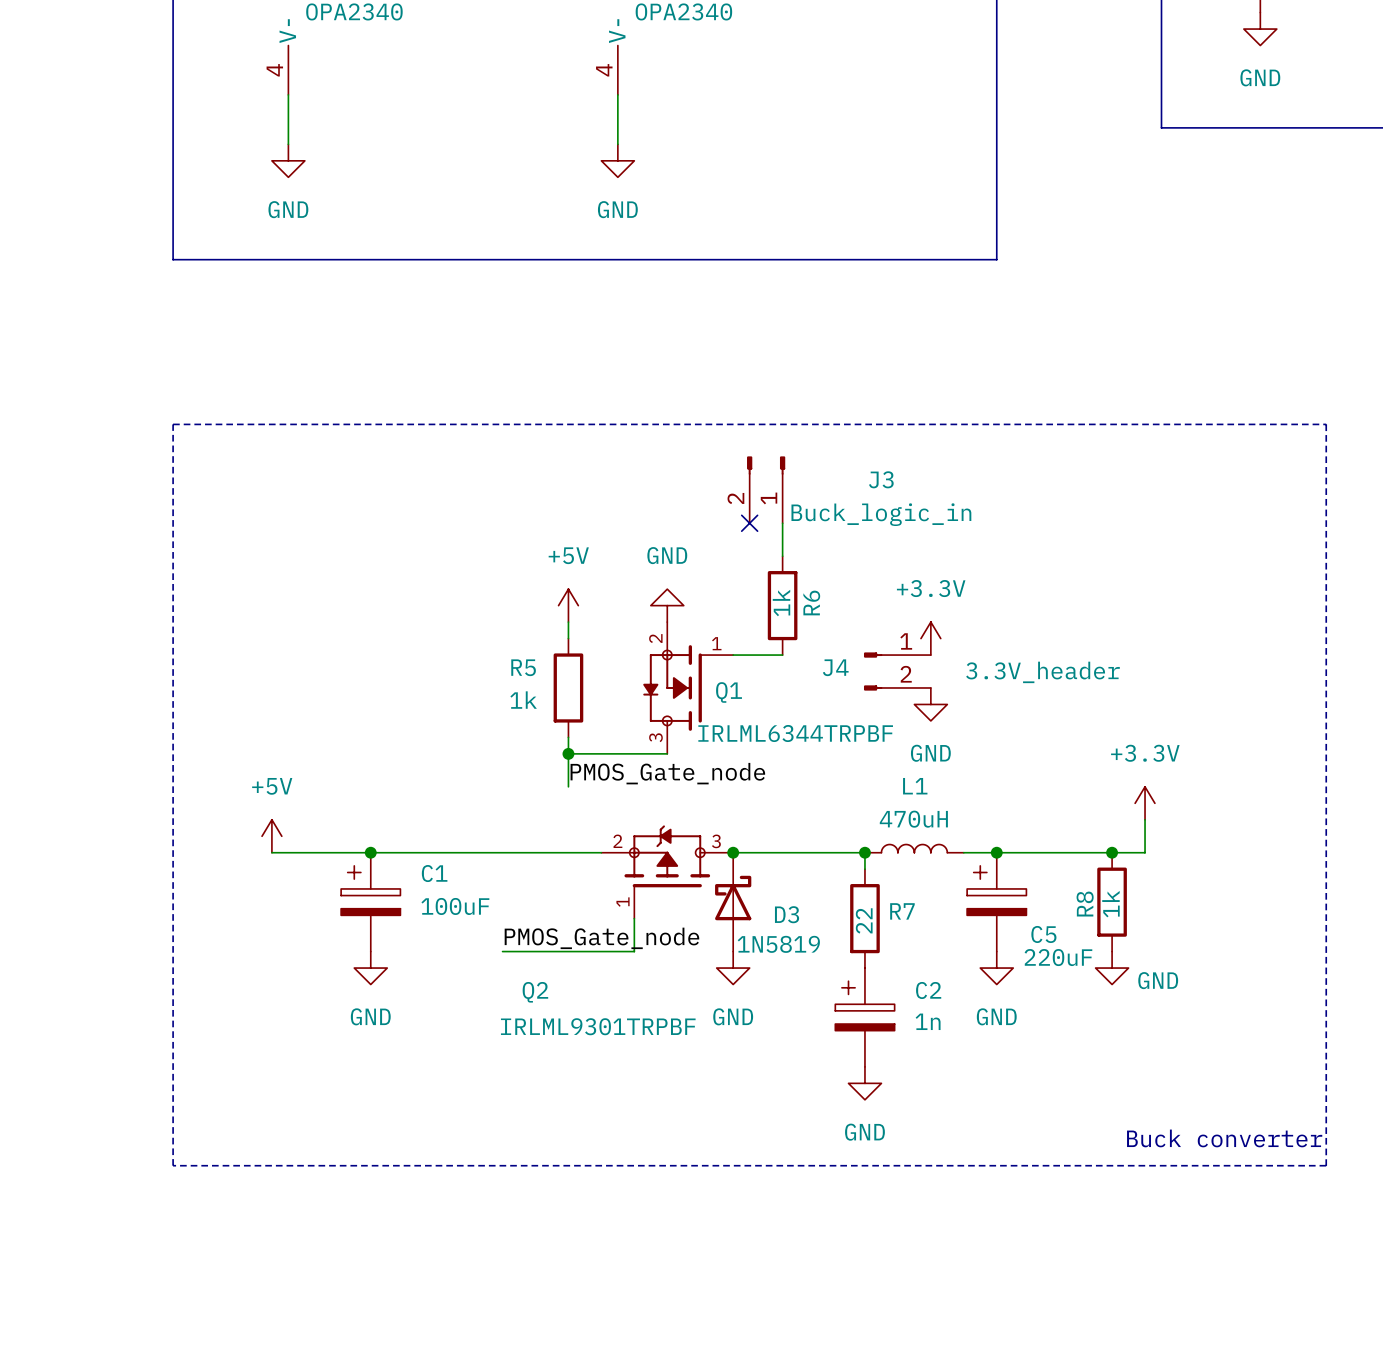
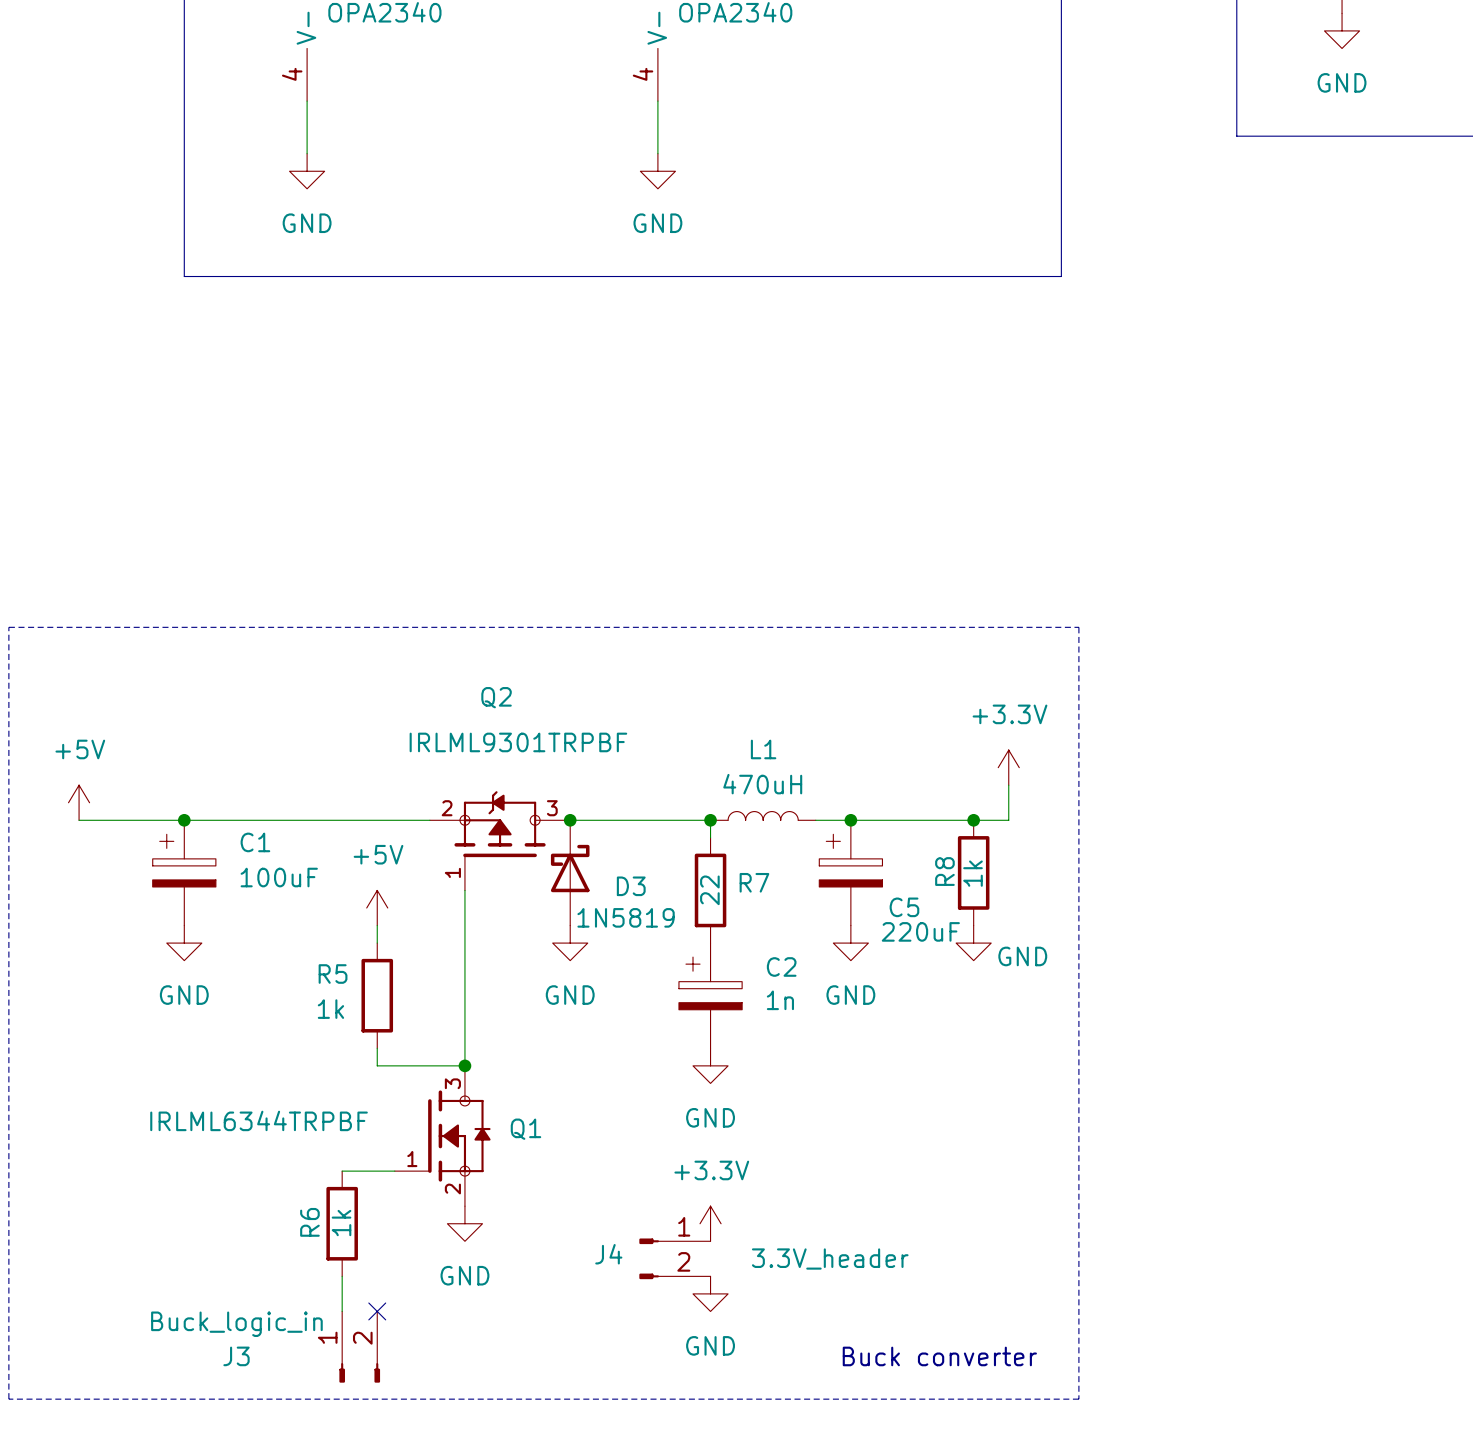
line: (173, 424) (1326, 424) (1326, 1165) (173, 1165) (173, 424) -> none
J3 rotation: 0° (766, 465) -> 180° (359, 1372)
J3 position: (766, 489) -> (359, 1347)
no-connect mark: (749, 523) -> none
wire: (782, 523) (782, 556) -> none
line: none -> (8, 627) (1078, 627) (1078, 1399) (8, 1399) (8, 627)
R6 name position: R6 (811, 603) -> R6 (309, 1222)
power symbol: +5V (568, 605) -> none
power symbol: GND (667, 605) -> none
R6 position: (782, 605) -> (342, 1223)
wire: (568, 622) (568, 638) -> none
power symbol position: +3.3V (930, 638) -> +3.3V (1008, 767)
wire: (733, 655) (782, 655) -> none
J4 position: (897, 671) -> (674, 1258)
R5 position: (568, 687) -> (377, 995)
Q1 rotation: 0° (672, 687) -> 180° (459, 1136)
Q1 position: (688, 687) -> (442, 1136)
Q1 name position: Q1 (729, 692) -> Q1 (525, 1129)
power symbol: GND (930, 704) -> none
Q1 value position: IRLML6344TRPBF (795, 733) -> IRLML6344TRPBF (259, 1120)
wire: (568, 737) (568, 786) -> none
power symbol: none -> +5V (79, 802)
wire: (568, 753) (667, 753) -> none
junction position: (568, 753) -> (570, 820)
junction: none -> (184, 820)
junction: none -> (710, 820)
junction: none -> (850, 820)
junction: none -> (973, 820)
label: PMOS_Gate_node (667, 773) -> none
power symbol: +3.3V (1145, 803) -> none
wire: (1145, 819) (1145, 852) (963, 852) -> (1008, 785) (1008, 820) (815, 820)
power symbol position: +5V (271, 836) -> +5V (377, 908)
wire: none -> (464, 890) (464, 1065) (377, 1065) (377, 1048)
L1 position: (914, 848) -> (763, 815)
wire: (271, 852) (601, 852) -> (79, 820) (429, 820)
junction: (370, 852) -> none
wire: (733, 852) (864, 852) (864, 869) -> (570, 820) (710, 820) (710, 837)
junction: (733, 852) -> none
junction: (864, 852) -> none
junction: (996, 852) -> none
junction: (1112, 852) -> none
Q2 position: (667, 872) -> (500, 840)
power symbol: none -> GND (184, 943)
power symbol: none -> GND (570, 943)
power symbol: none -> GND (850, 943)
power symbol: none -> GND (973, 943)
C1 position: (370, 902) -> (184, 872)
D3 position: (733, 902) -> (570, 872)
C5 position: (996, 902) -> (850, 872)
R8 position: (1112, 902) -> (973, 872)
wire: (634, 918) (634, 951) (502, 951) -> none
R7 position: (864, 918) -> (710, 890)
label: PMOS_Gate_node (601, 938) -> none
power symbol: GND (370, 968) -> none
power symbol: GND (733, 968) -> none
power symbol: GND (996, 968) -> none
power symbol: GND (1112, 968) -> none
Q2 name position: Q2 (535, 992) -> Q2 (496, 697)
junction: none -> (464, 1065)
power symbol: none -> GND (710, 1065)
C2 position: (864, 1017) -> (710, 995)
Q2 value position: IRLML9301TRPBF (598, 1026) -> IRLML9301TRPBF (518, 742)
power symbol: GND (864, 1083) -> none
wire: none -> (342, 1171) (394, 1171)
text: Buck converter (1224, 1138) -> none
power symbol: none -> GND (464, 1223)
power symbol: none -> +3.3V (710, 1223)
wire: none -> (342, 1276) (342, 1311)
power symbol: none -> GND (710, 1293)
no-connect mark: none -> (377, 1311)
text: none -> Buck converter (939, 1356)

